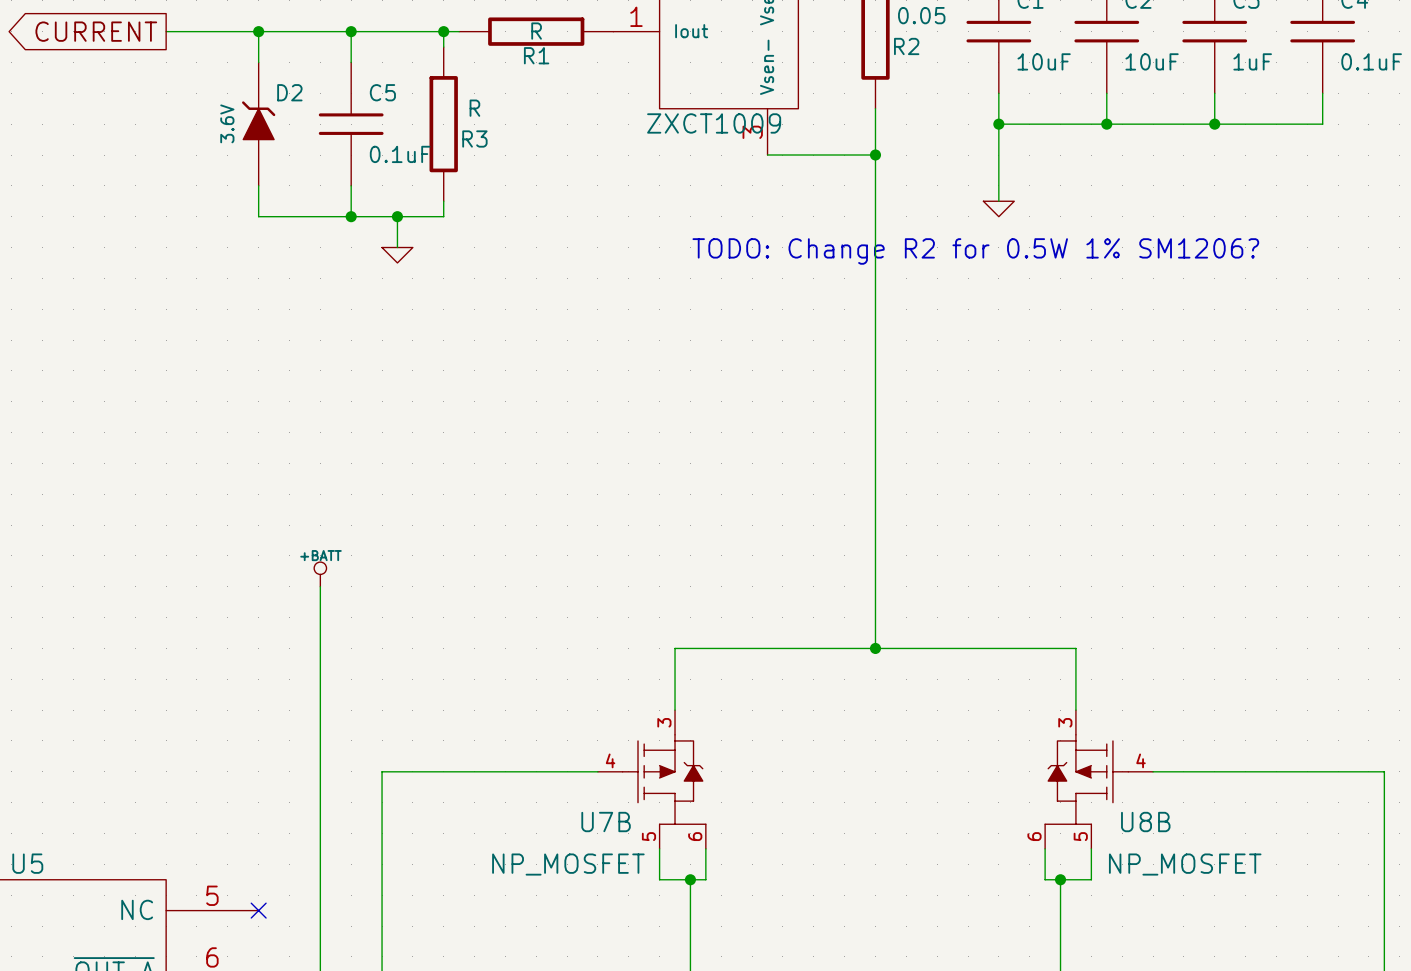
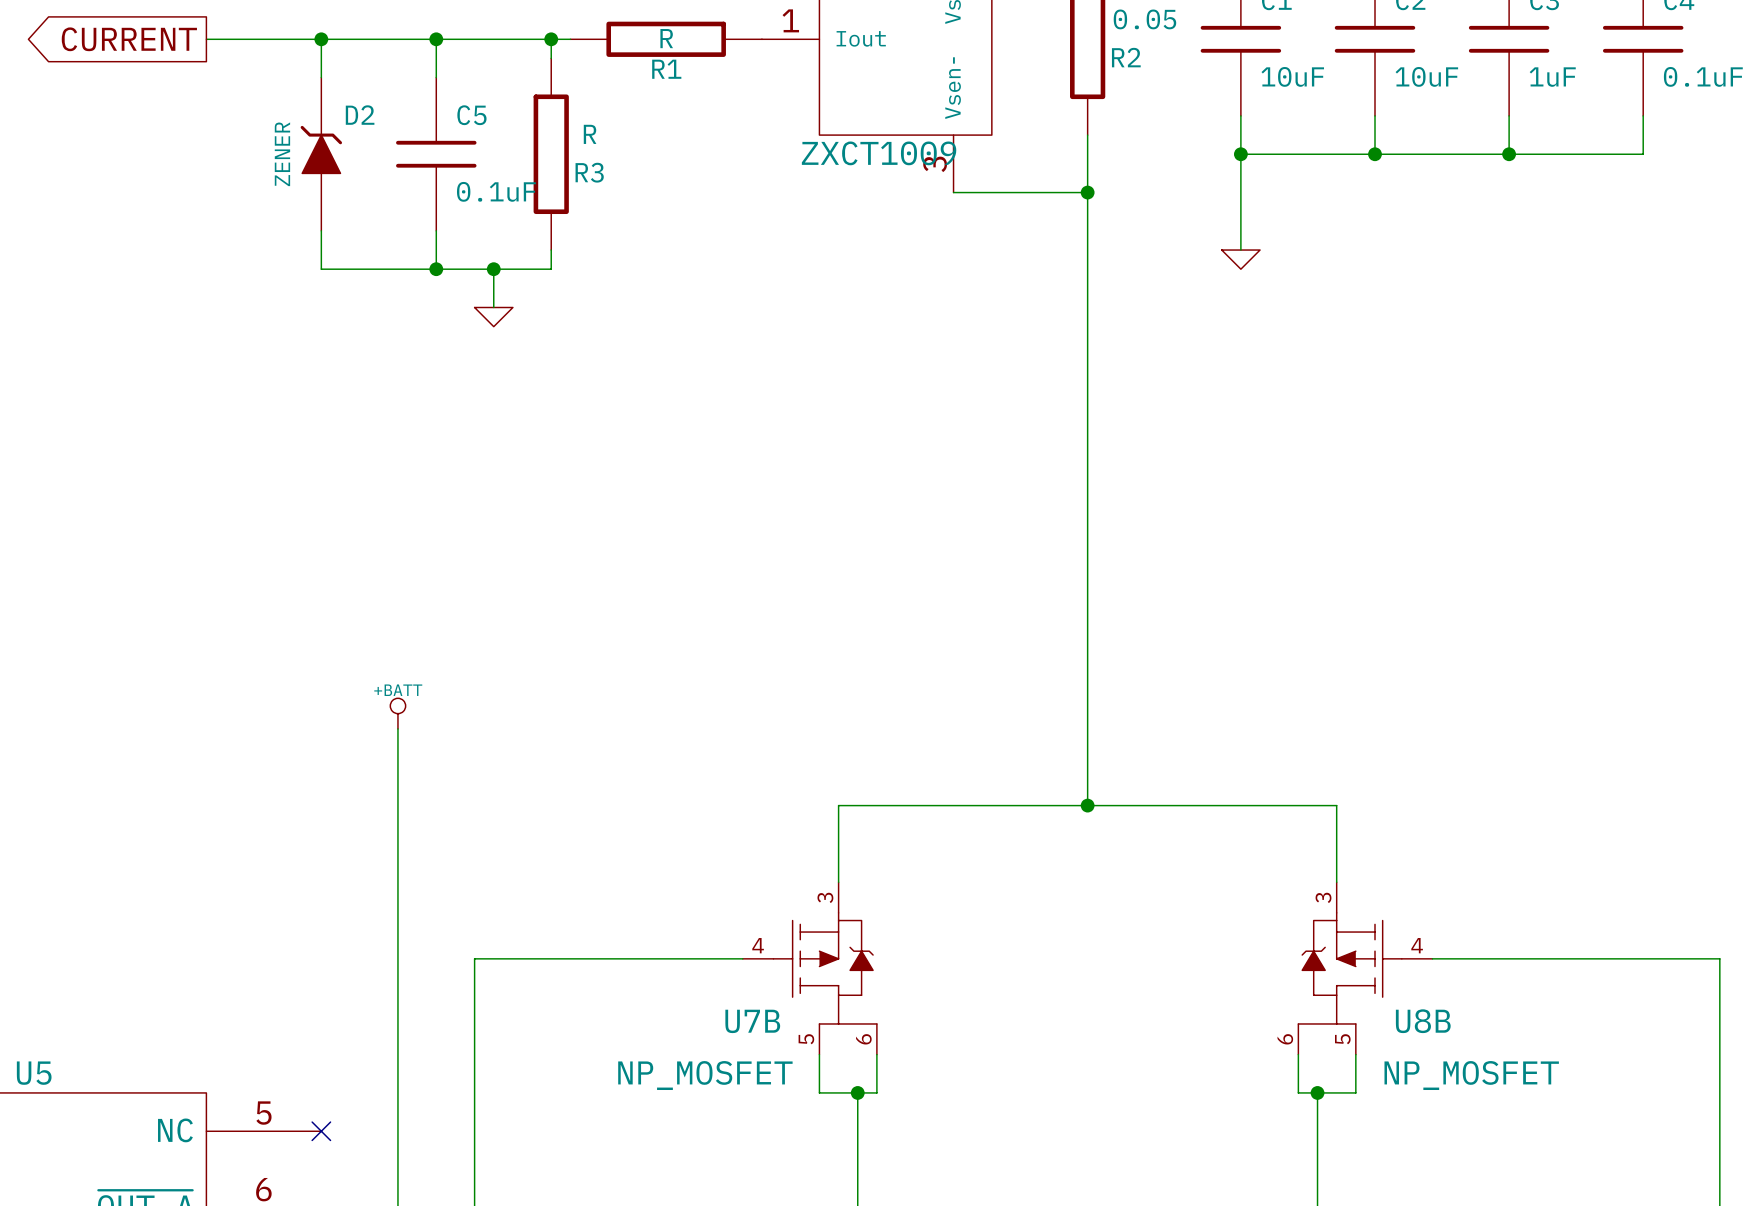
D2 value: 3.6V (227, 123) -> ZENER (282, 154)
text: TODO: Change R2 for 0.5W 1% SM1206? (975, 251) -> none

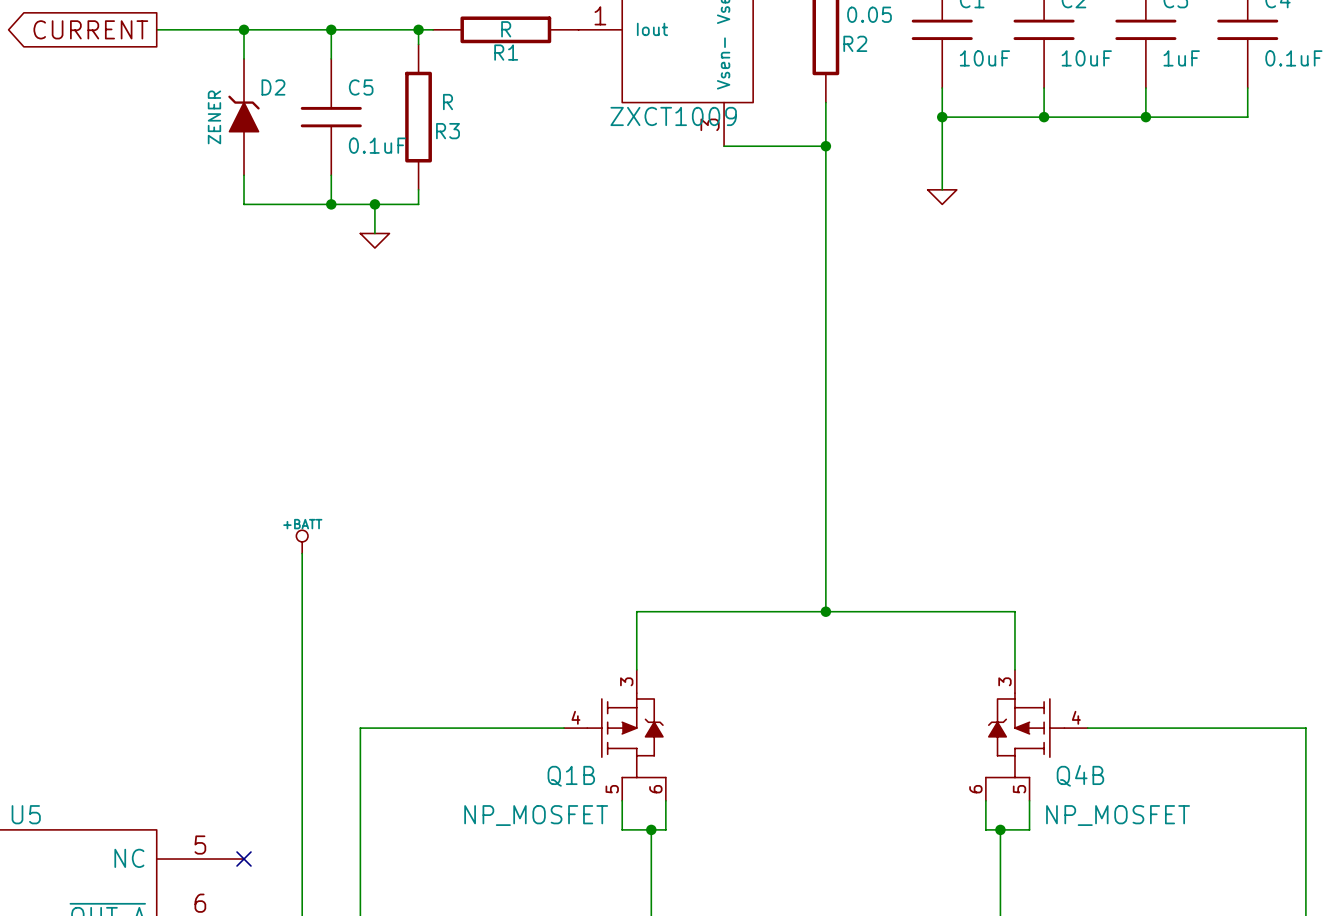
U7B name: U7B (752, 1021) -> Q1B (571, 776)
U8B name: U8B (1423, 1021) -> Q4B (1080, 775)

